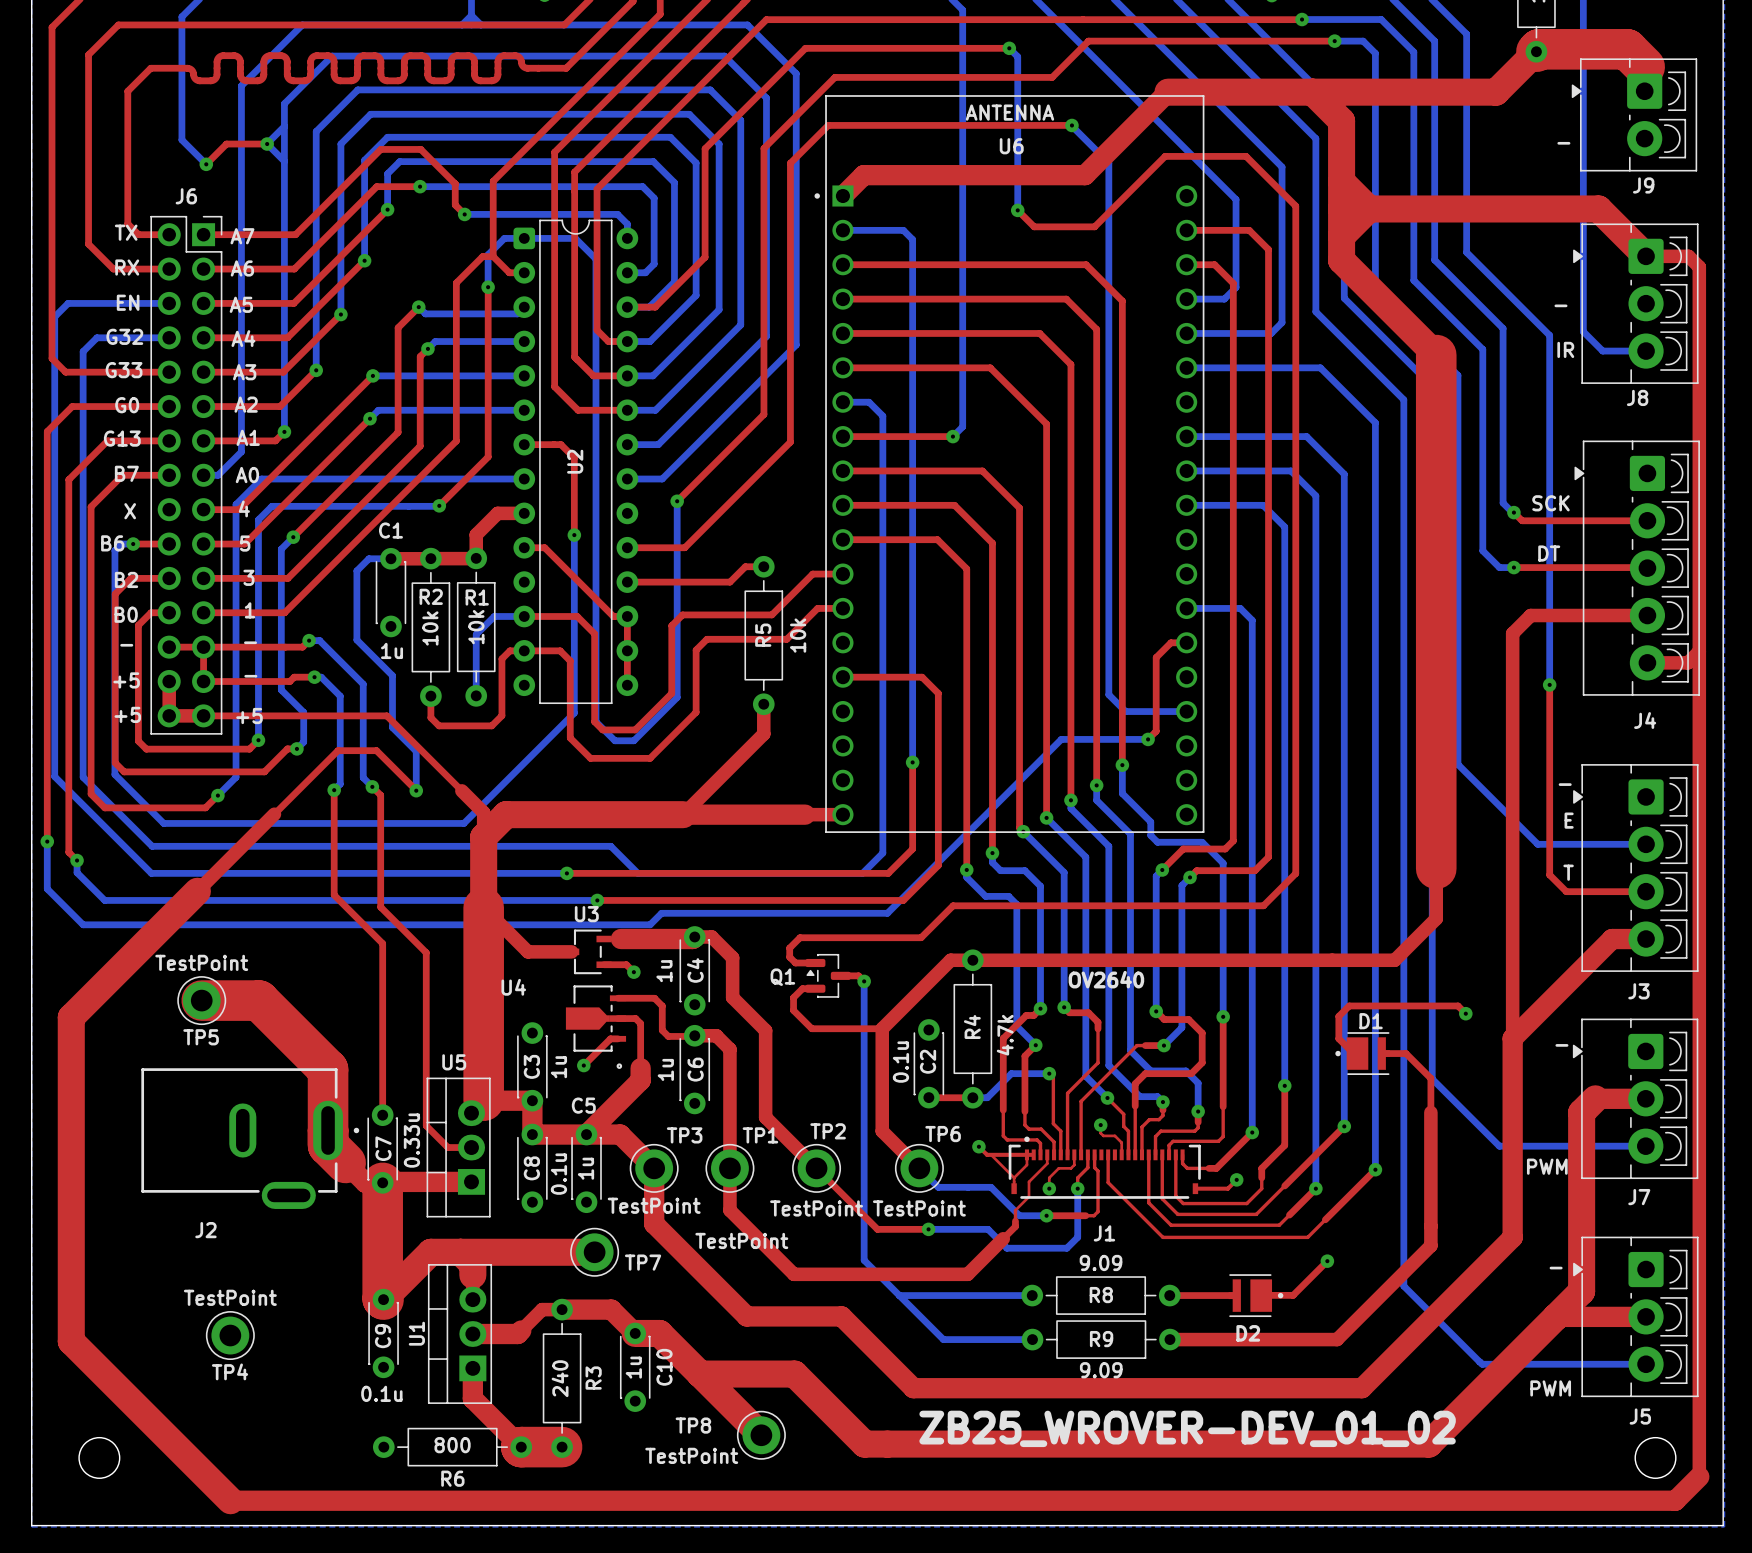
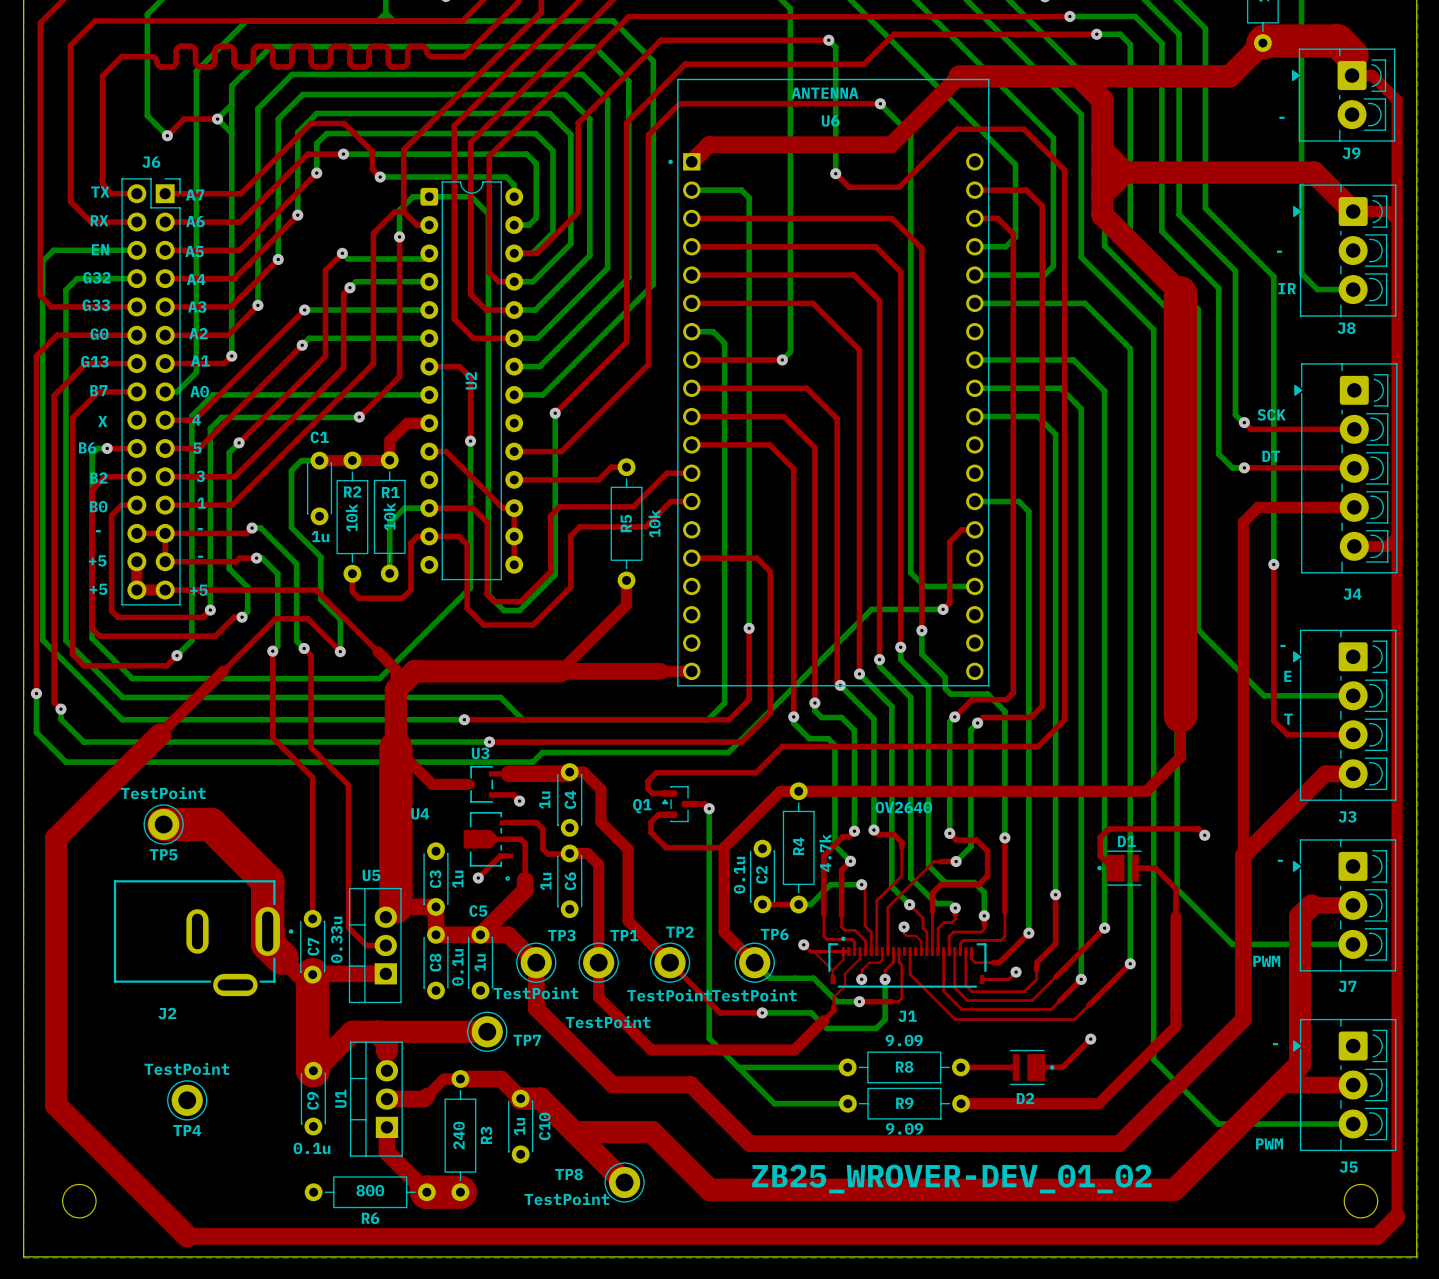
top track: none -> (1352, 75) (1372, 75) (1397, 100) (1397, 220)

